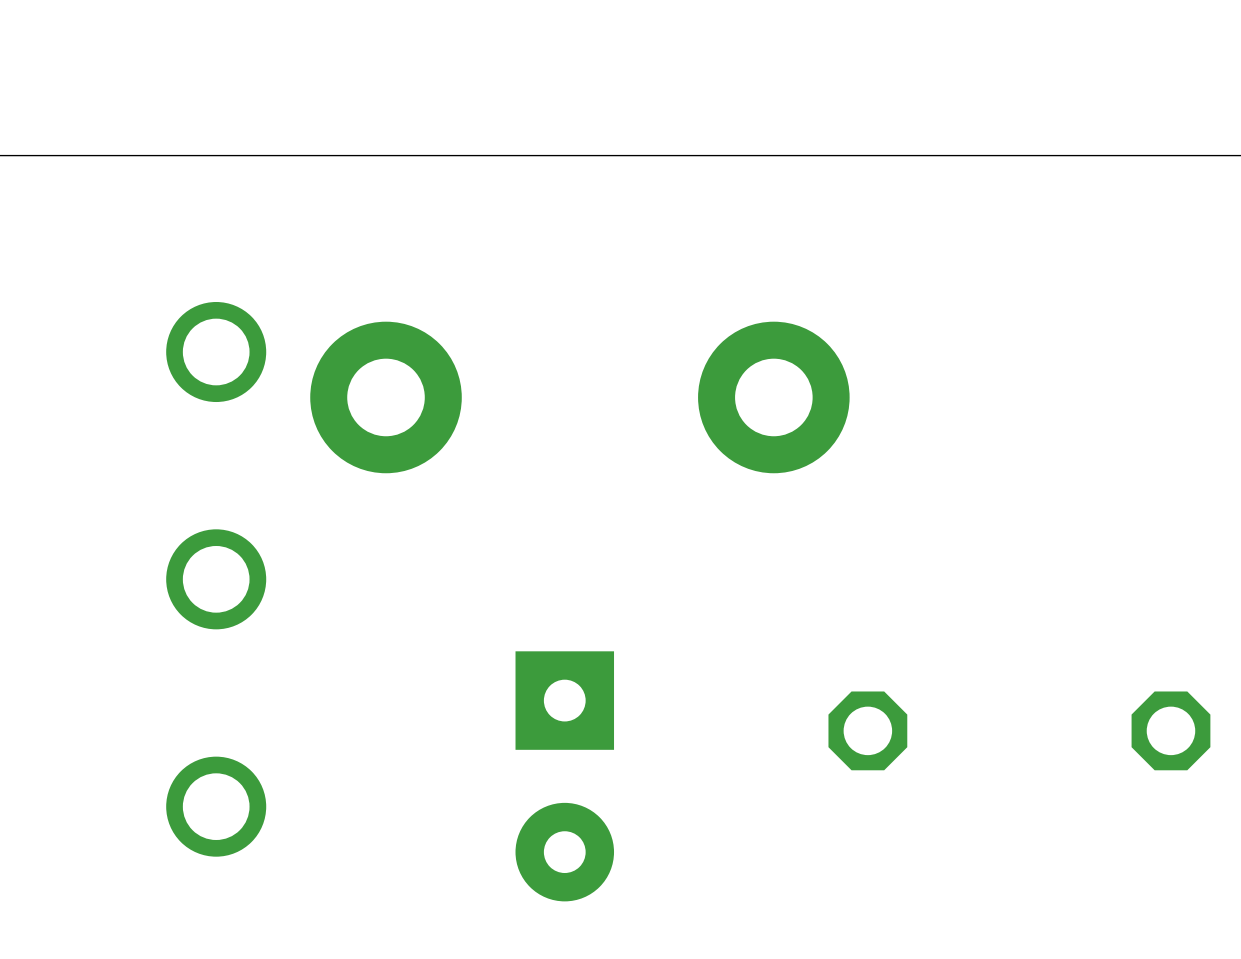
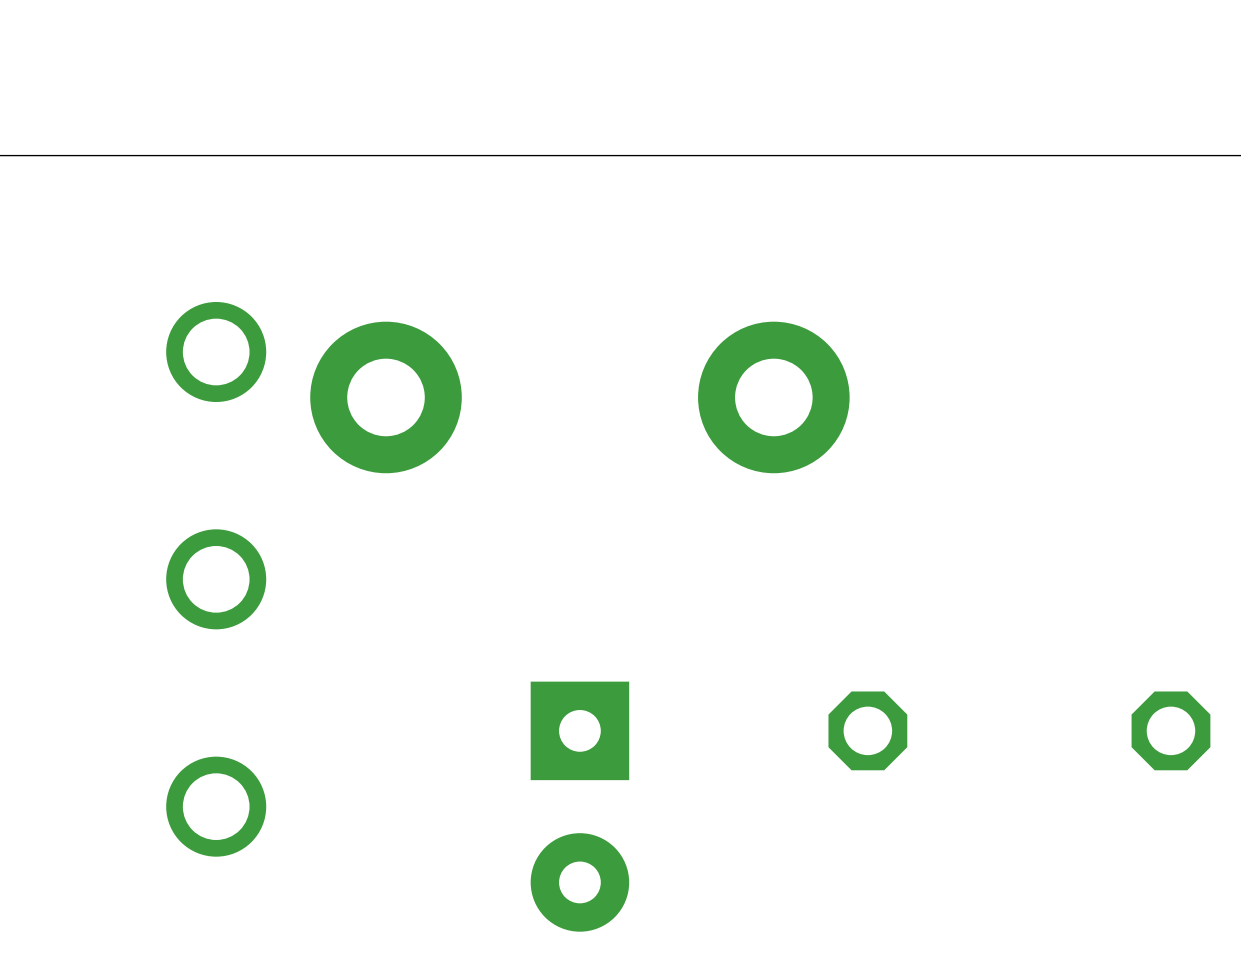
part position: (564, 776) -> (579, 806)

